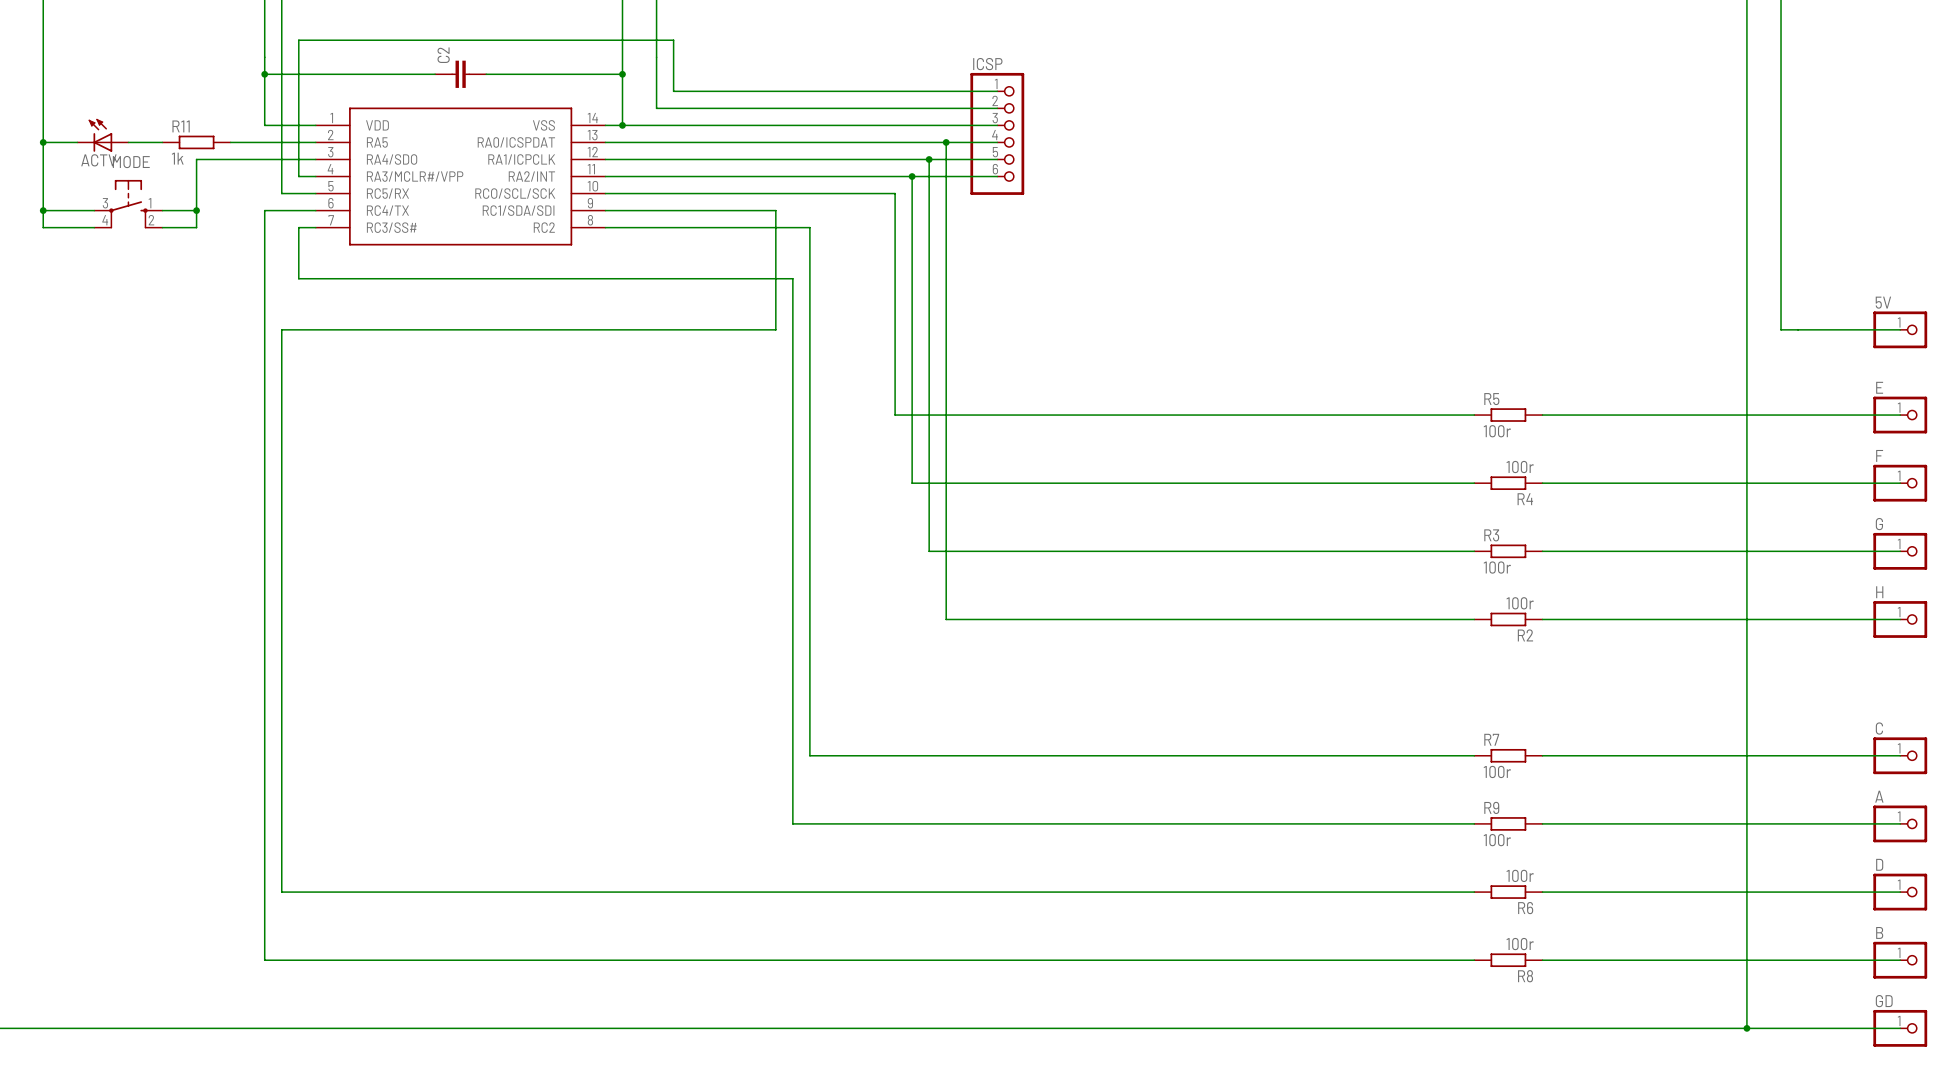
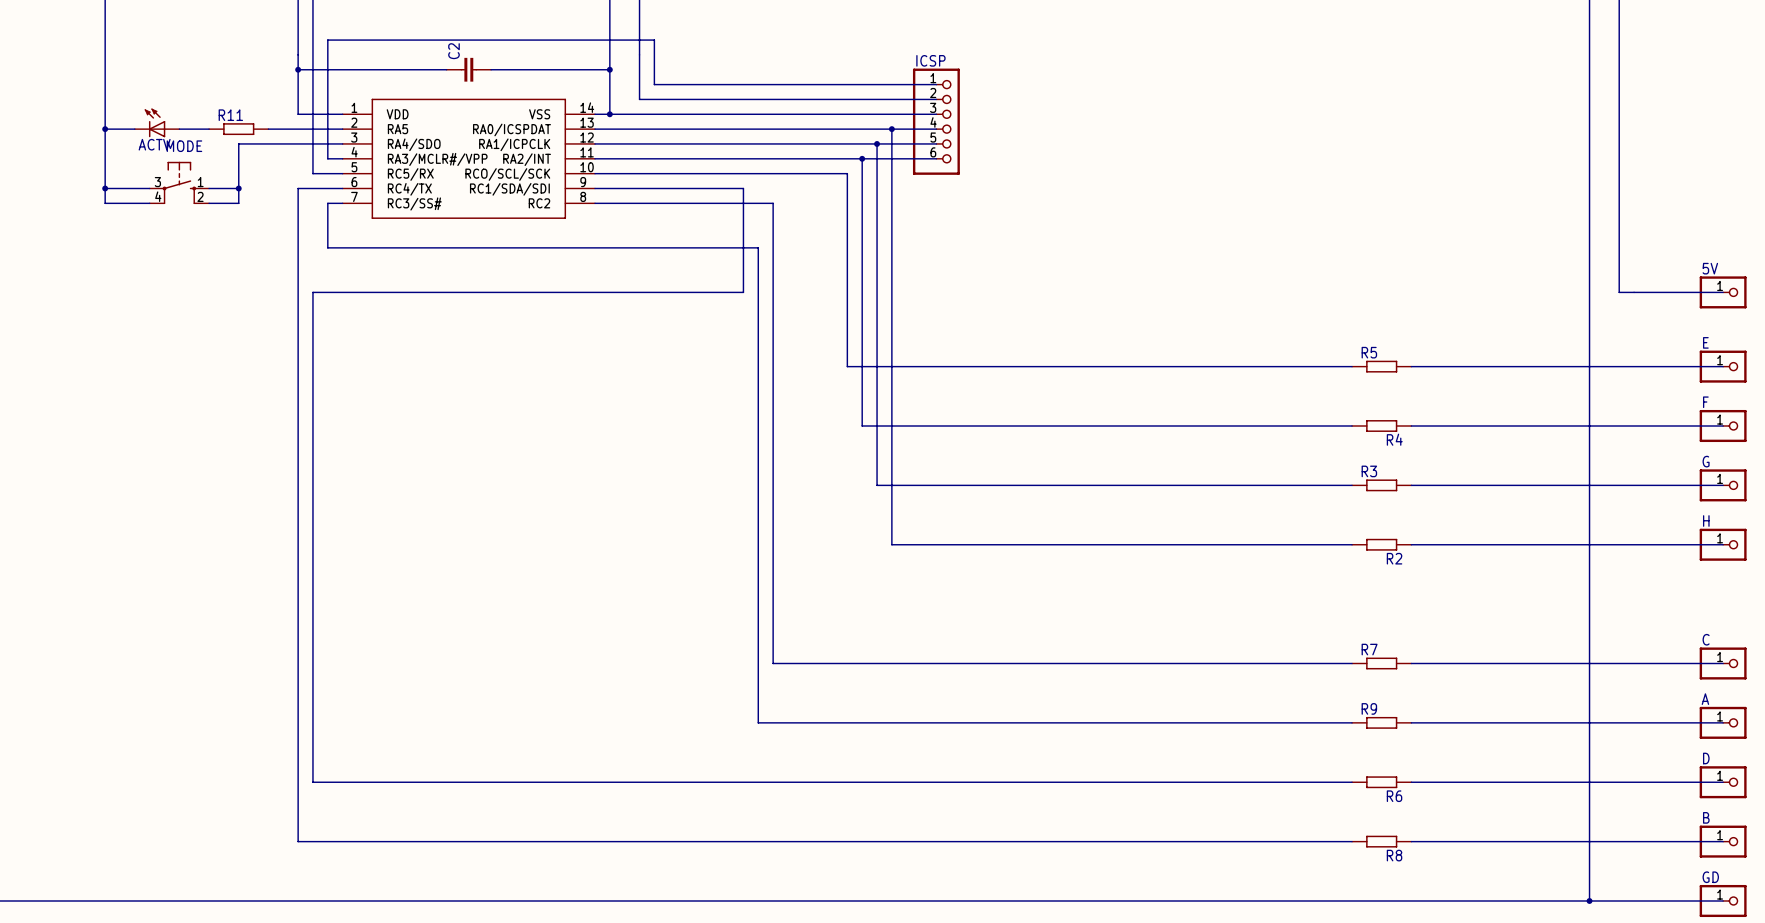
R11 value: 1k (177, 158) -> none
R5 value: 100r (1497, 431) -> none
R4 value: 100r (1520, 467) -> none
R3 value: 100r (1497, 567) -> none
R2 value: 100r (1520, 603) -> none
R7 value: 100r (1497, 771) -> none
R9 value: 100r (1497, 840) -> none
R6 value: 100r (1520, 875) -> none
R8 value: 100r (1520, 944) -> none

